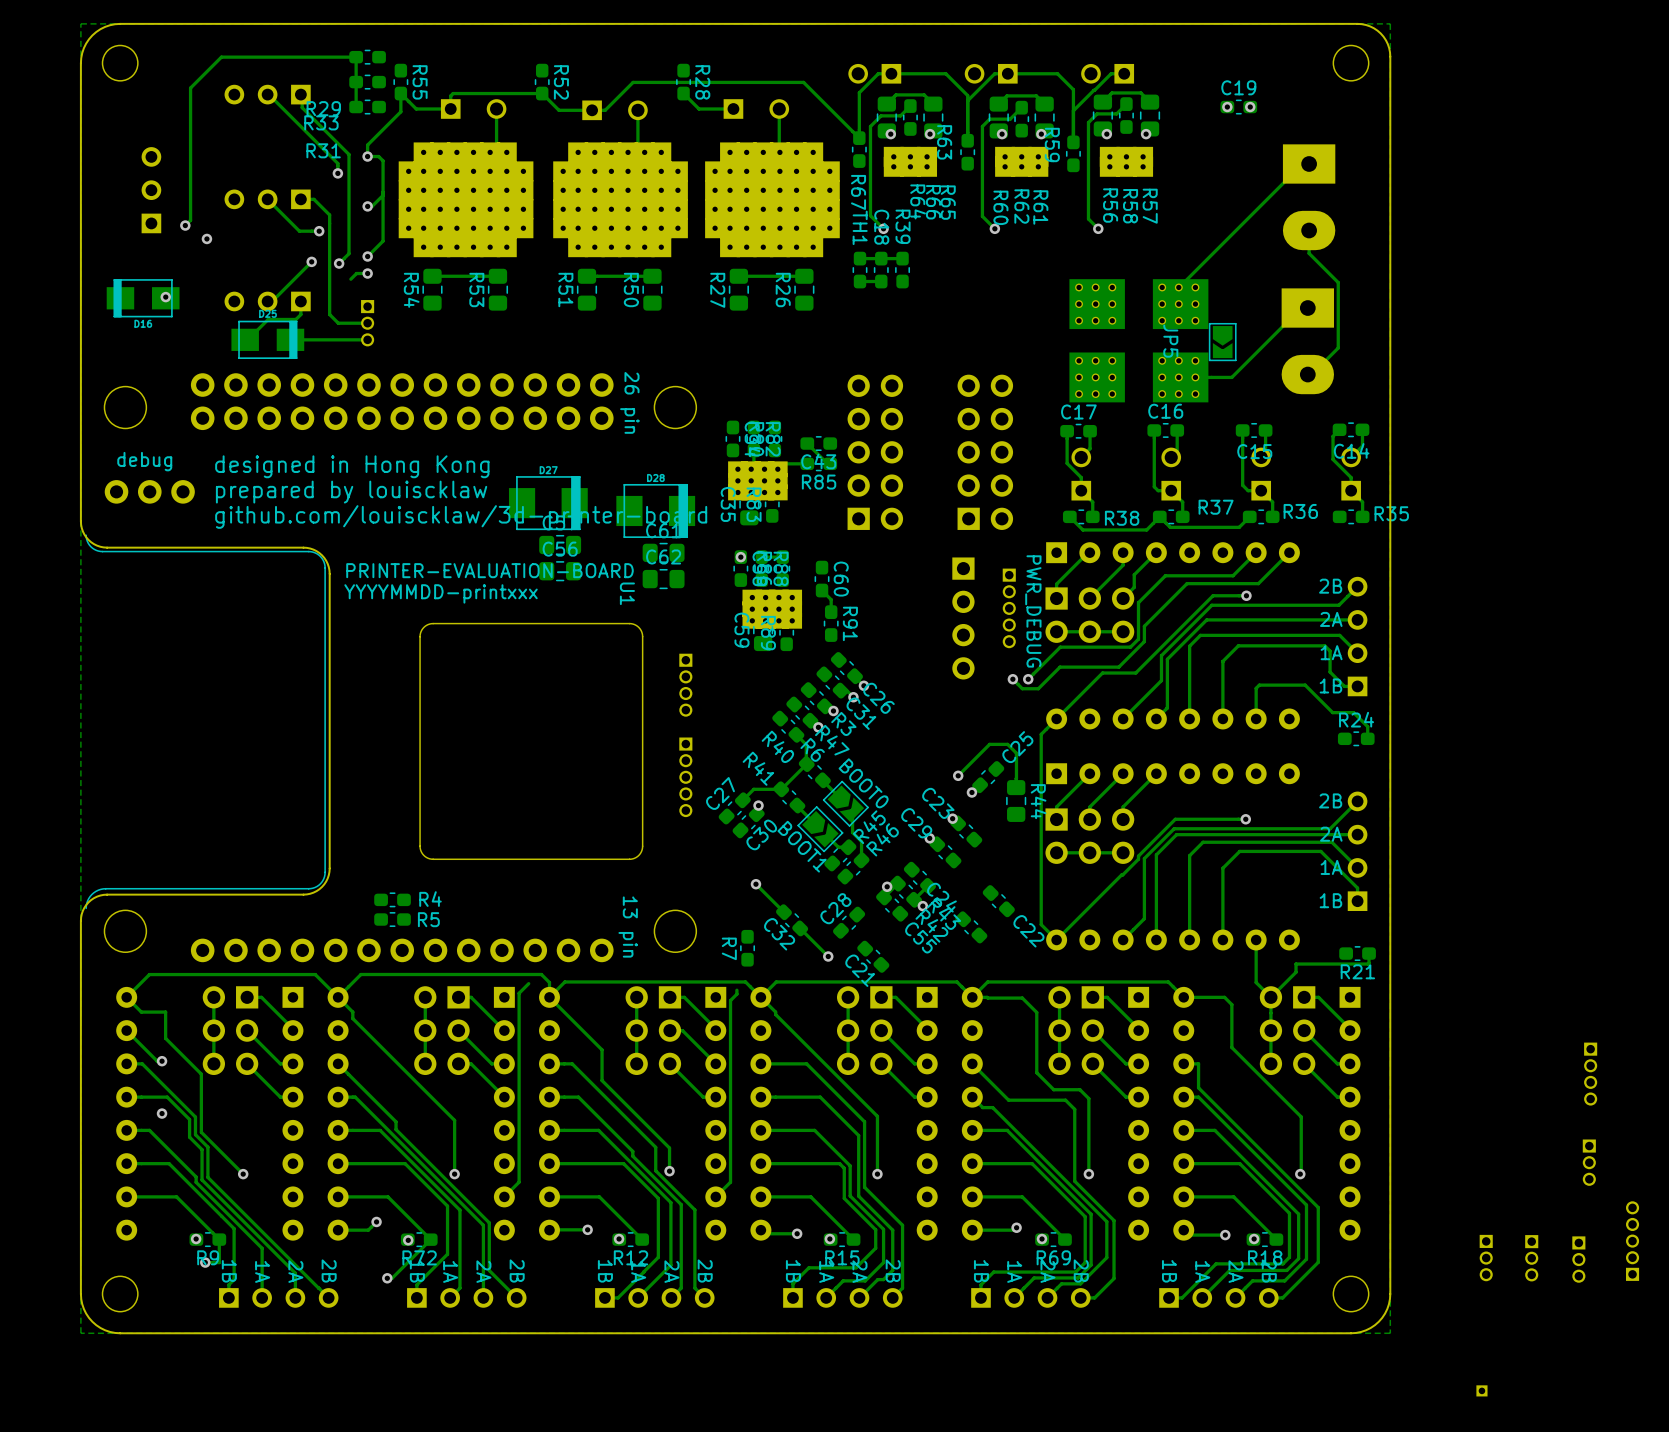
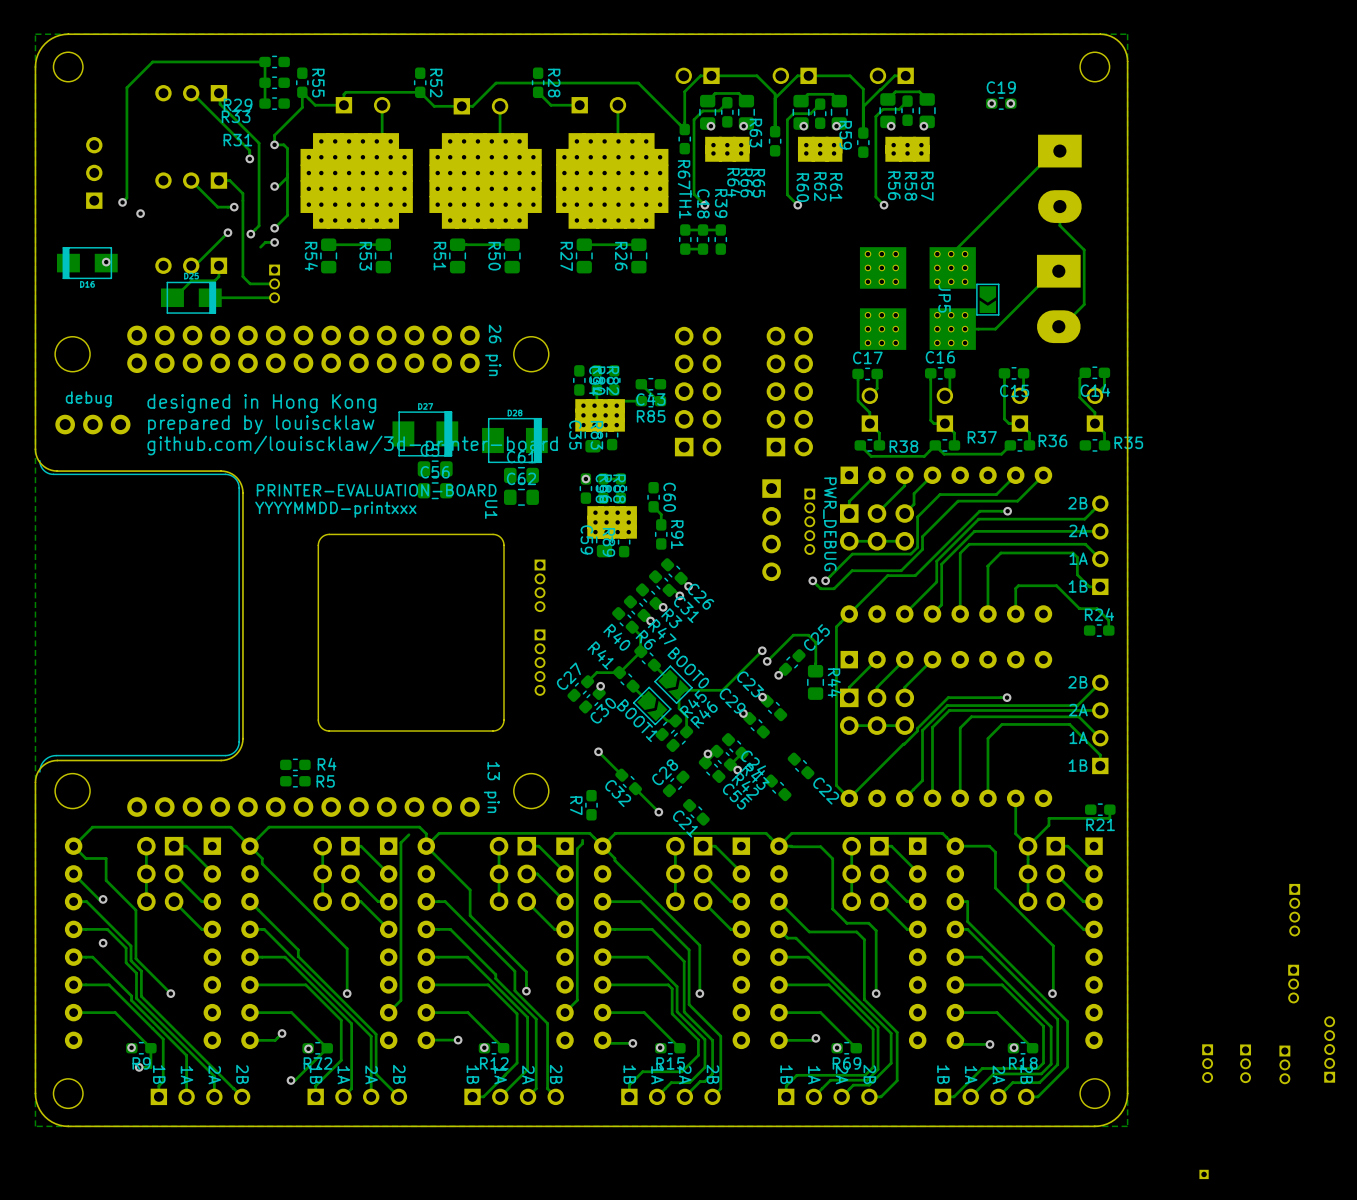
track: none -> (762, 650) (722, 690) (679, 690)
via: none -> (762, 650)

